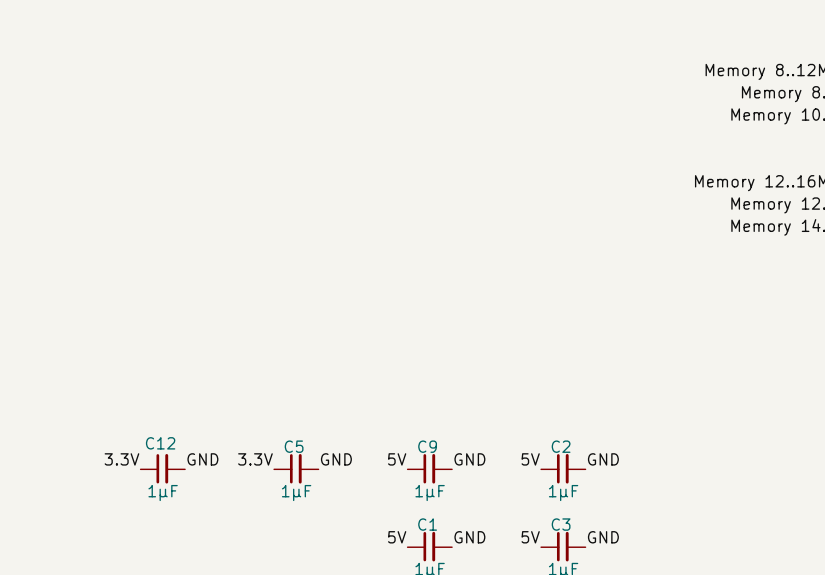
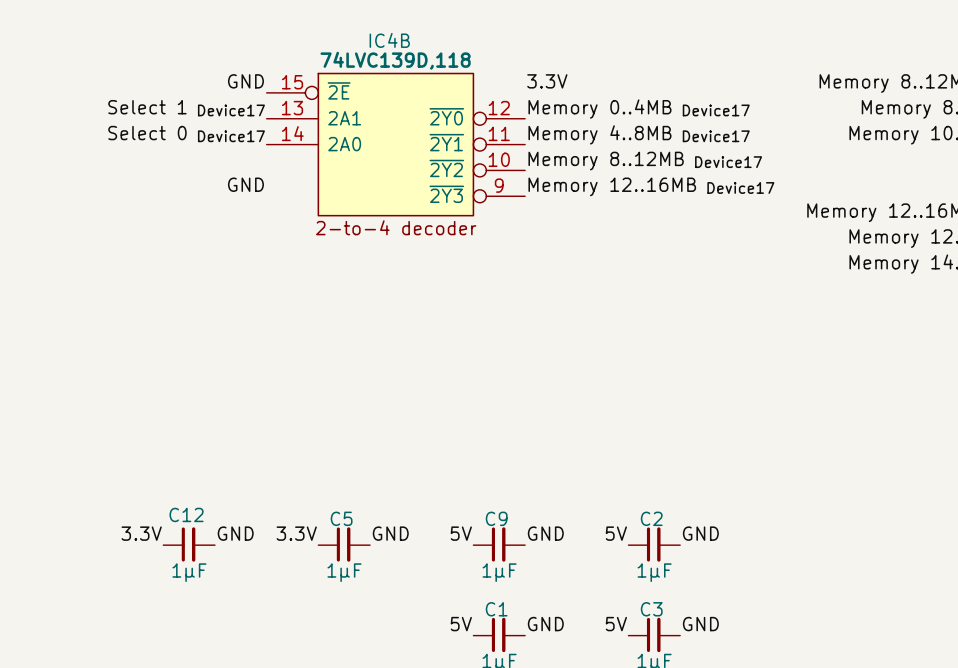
label: none -> GND (245, 81)
label: none -> 3.3V (547, 81)
label: none -> Select 1 Device17 (186, 108)
label: none -> Memory 0..4MB Device17 (639, 109)
label: none -> Select 0 Device17 (186, 134)
label: none -> Memory 4..8MB Device17 (639, 134)
IC4B: none -> 74LVC139D,118 (395, 144)
label: none -> Memory 8..12MB Device17 (645, 161)
label: none -> GND (245, 184)
label: none -> Memory 12..16MB Device17 (651, 186)

